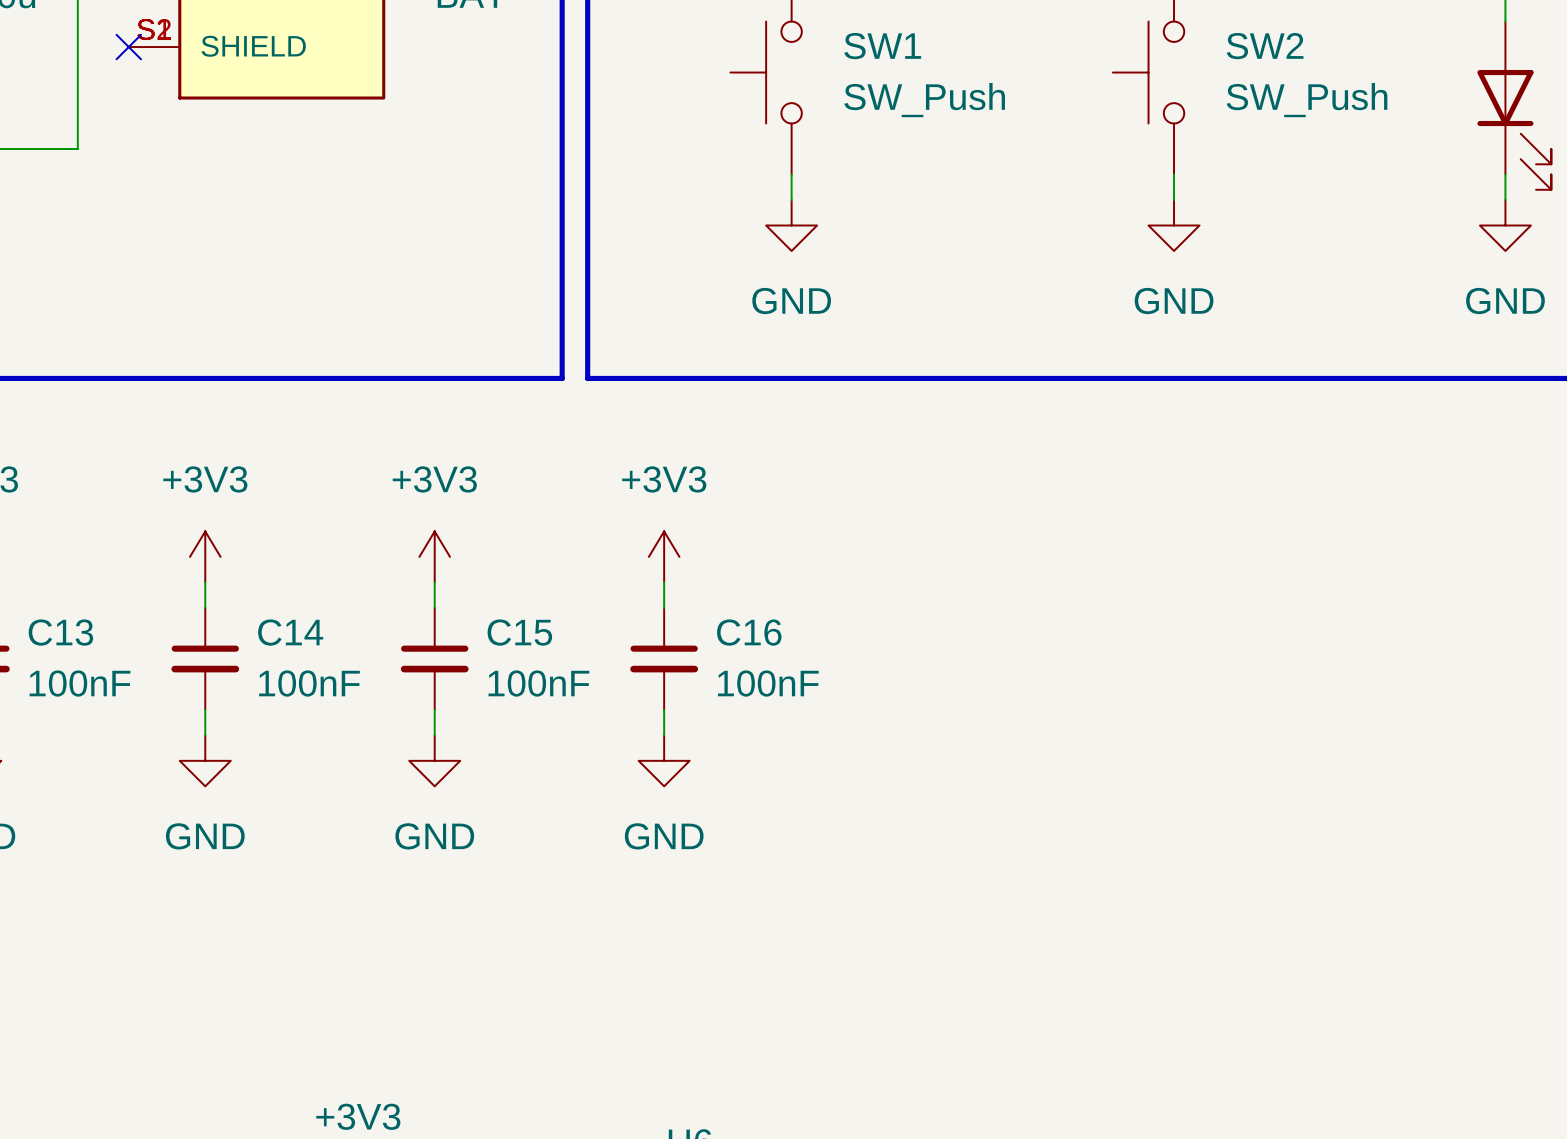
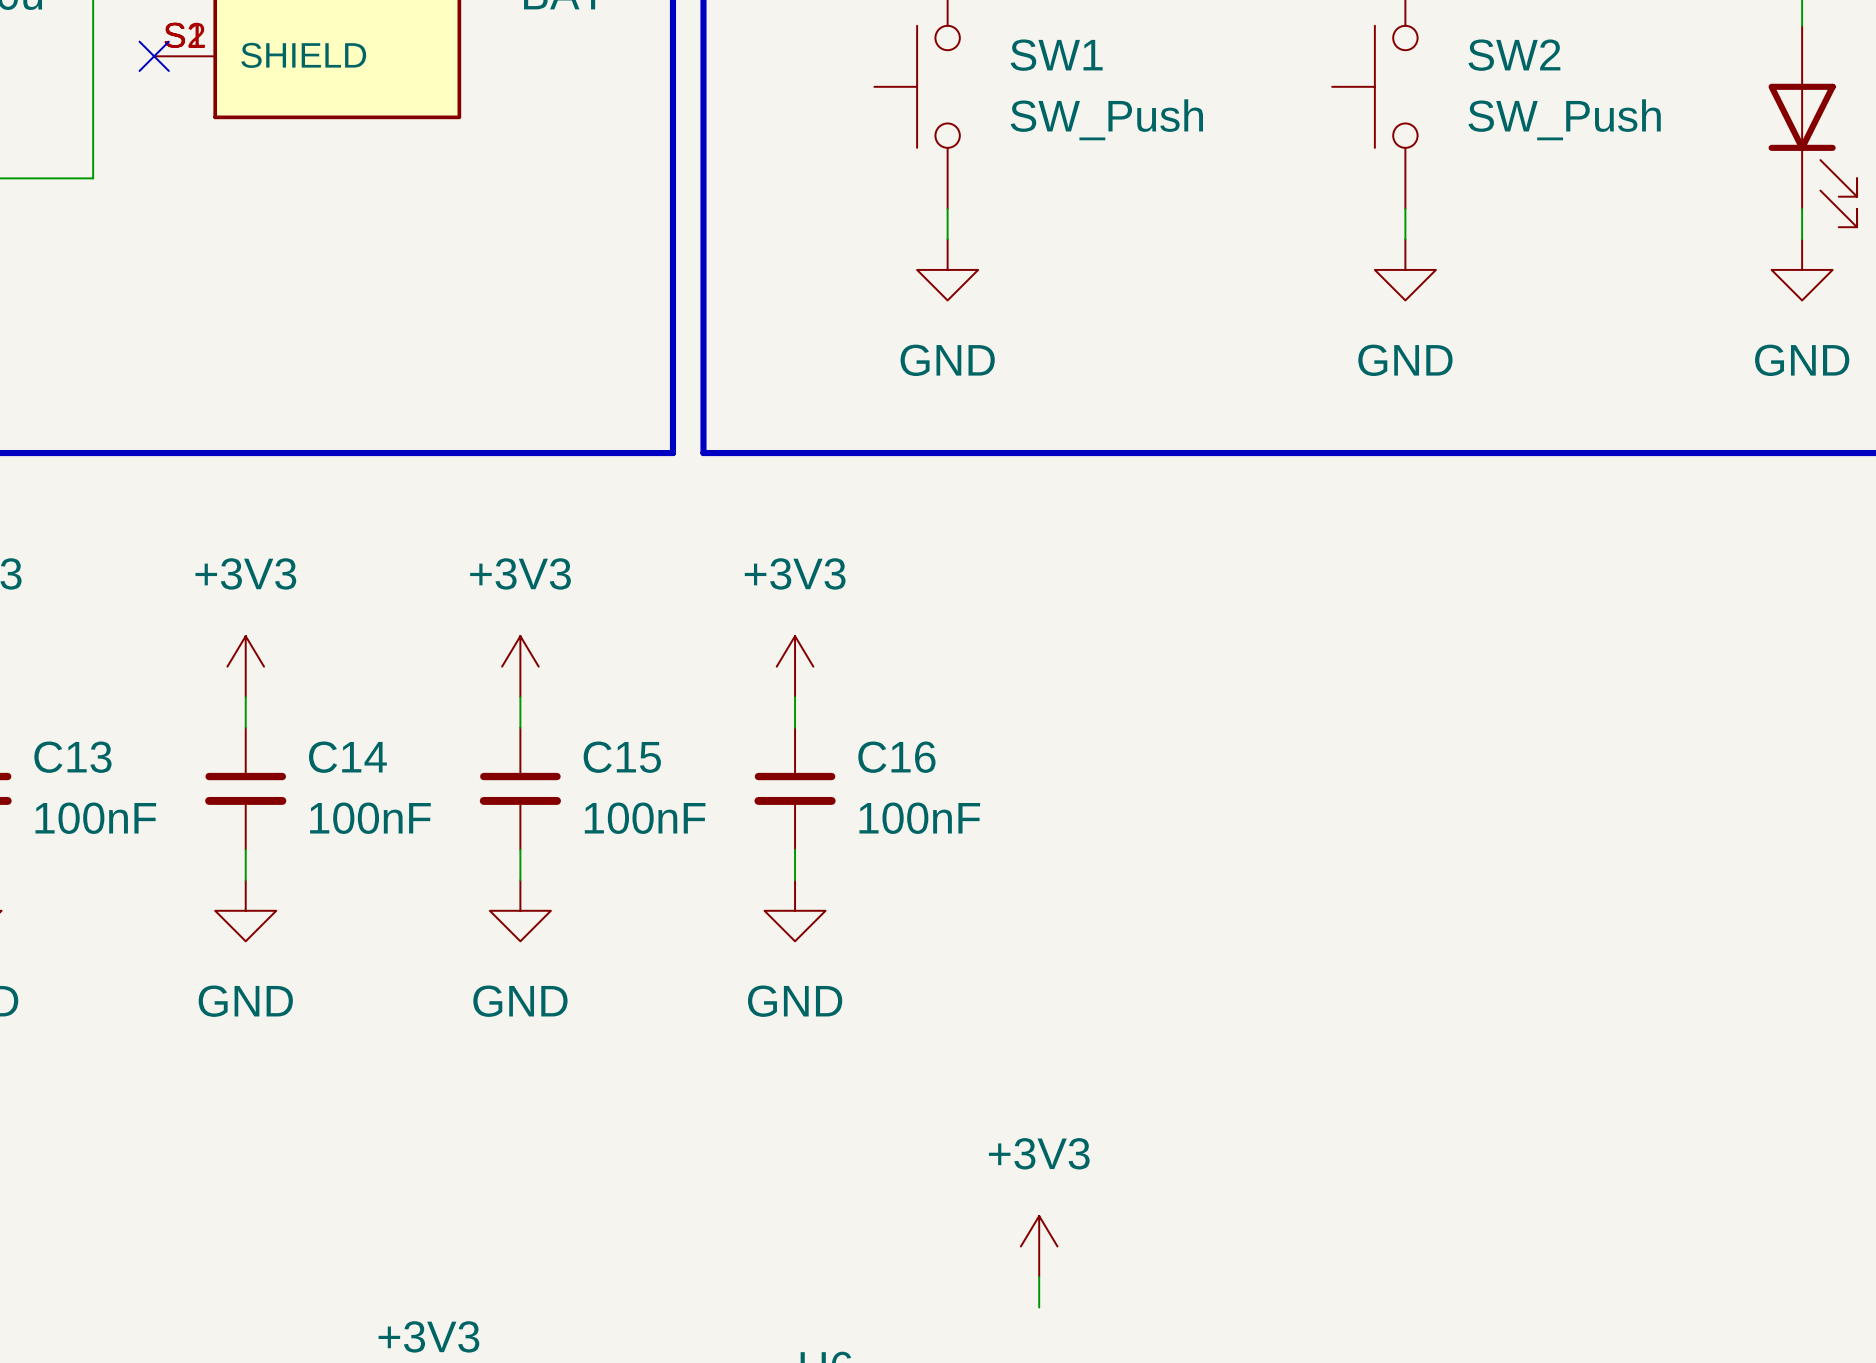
power symbol: none -> +3V3 (1039, 1246)
wire: none -> (1039, 1277) (1039, 1307)

